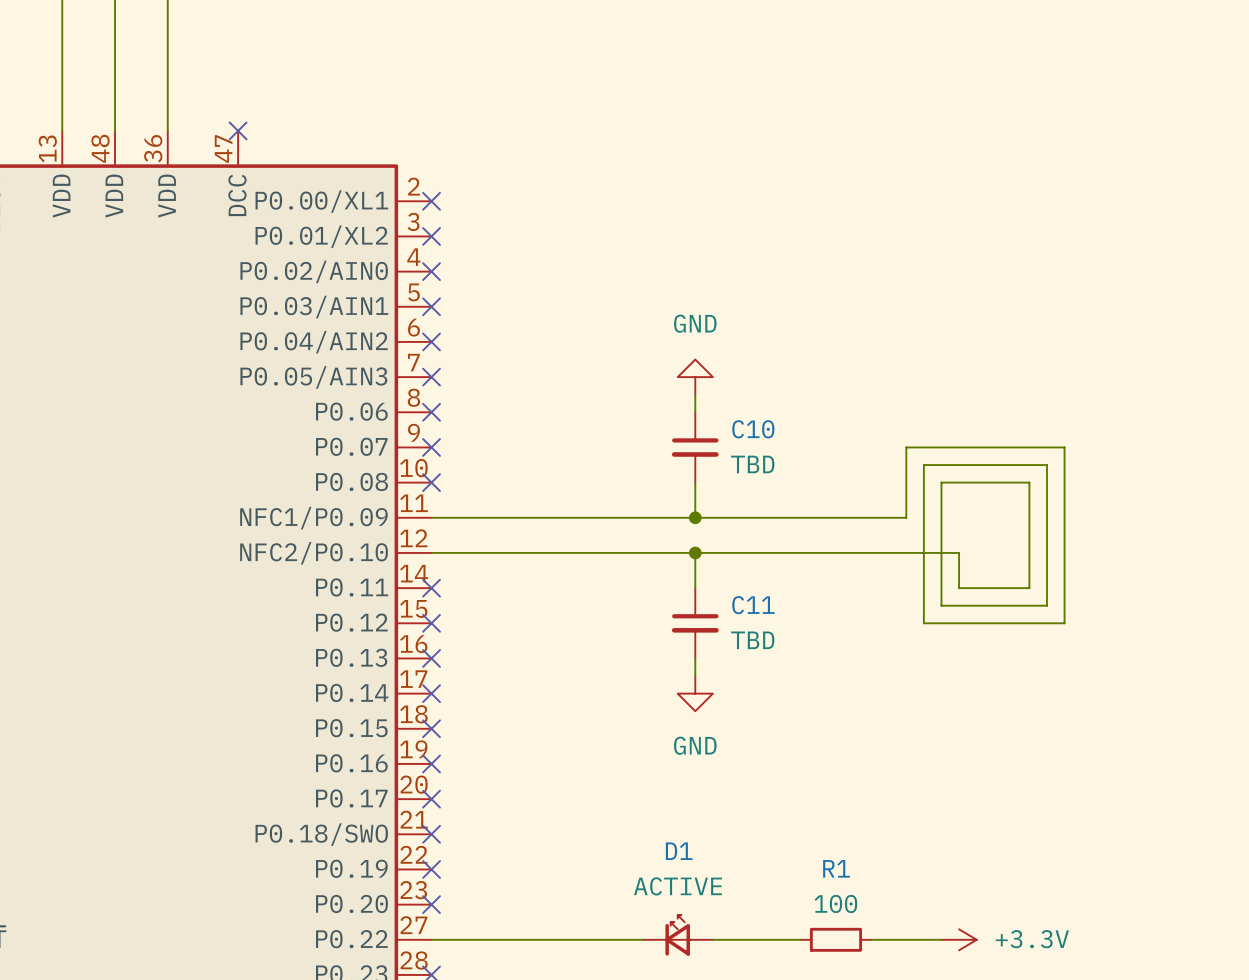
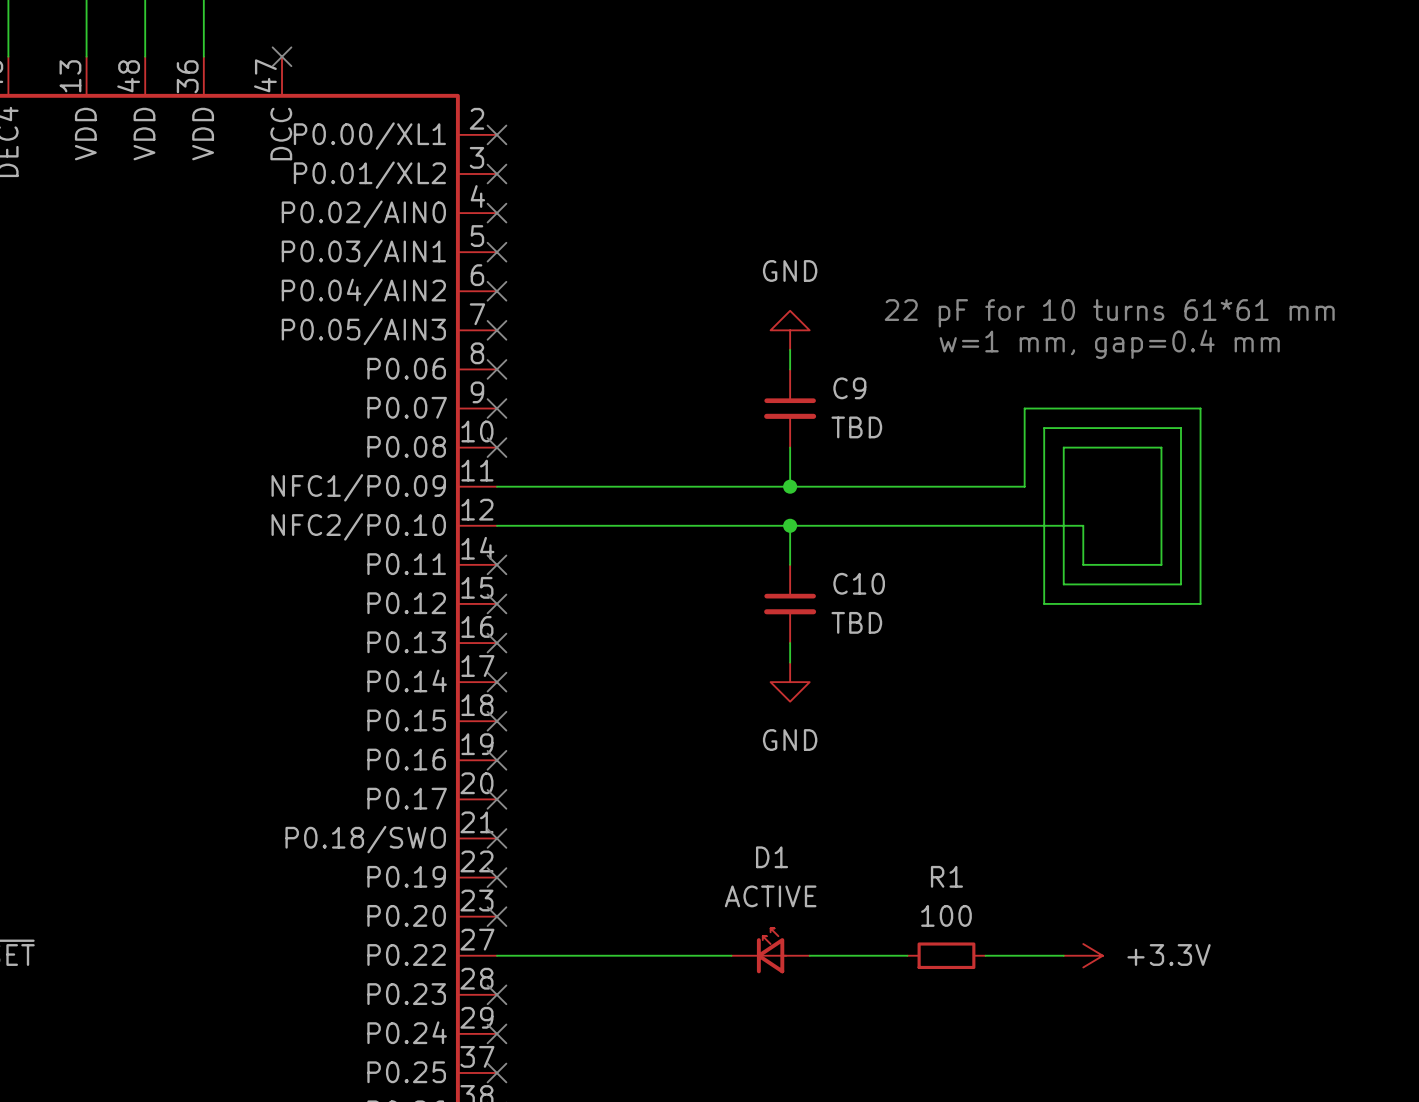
text: none -> 22 pF for 10 turns 61*61 mm (1109, 313)
text: none -> w=1 mm, gap=0.4 mm (1109, 344)
C10 name: C10 (753, 429) -> C9 (849, 388)
C11 name: C11 (753, 605) -> C10 (859, 583)

